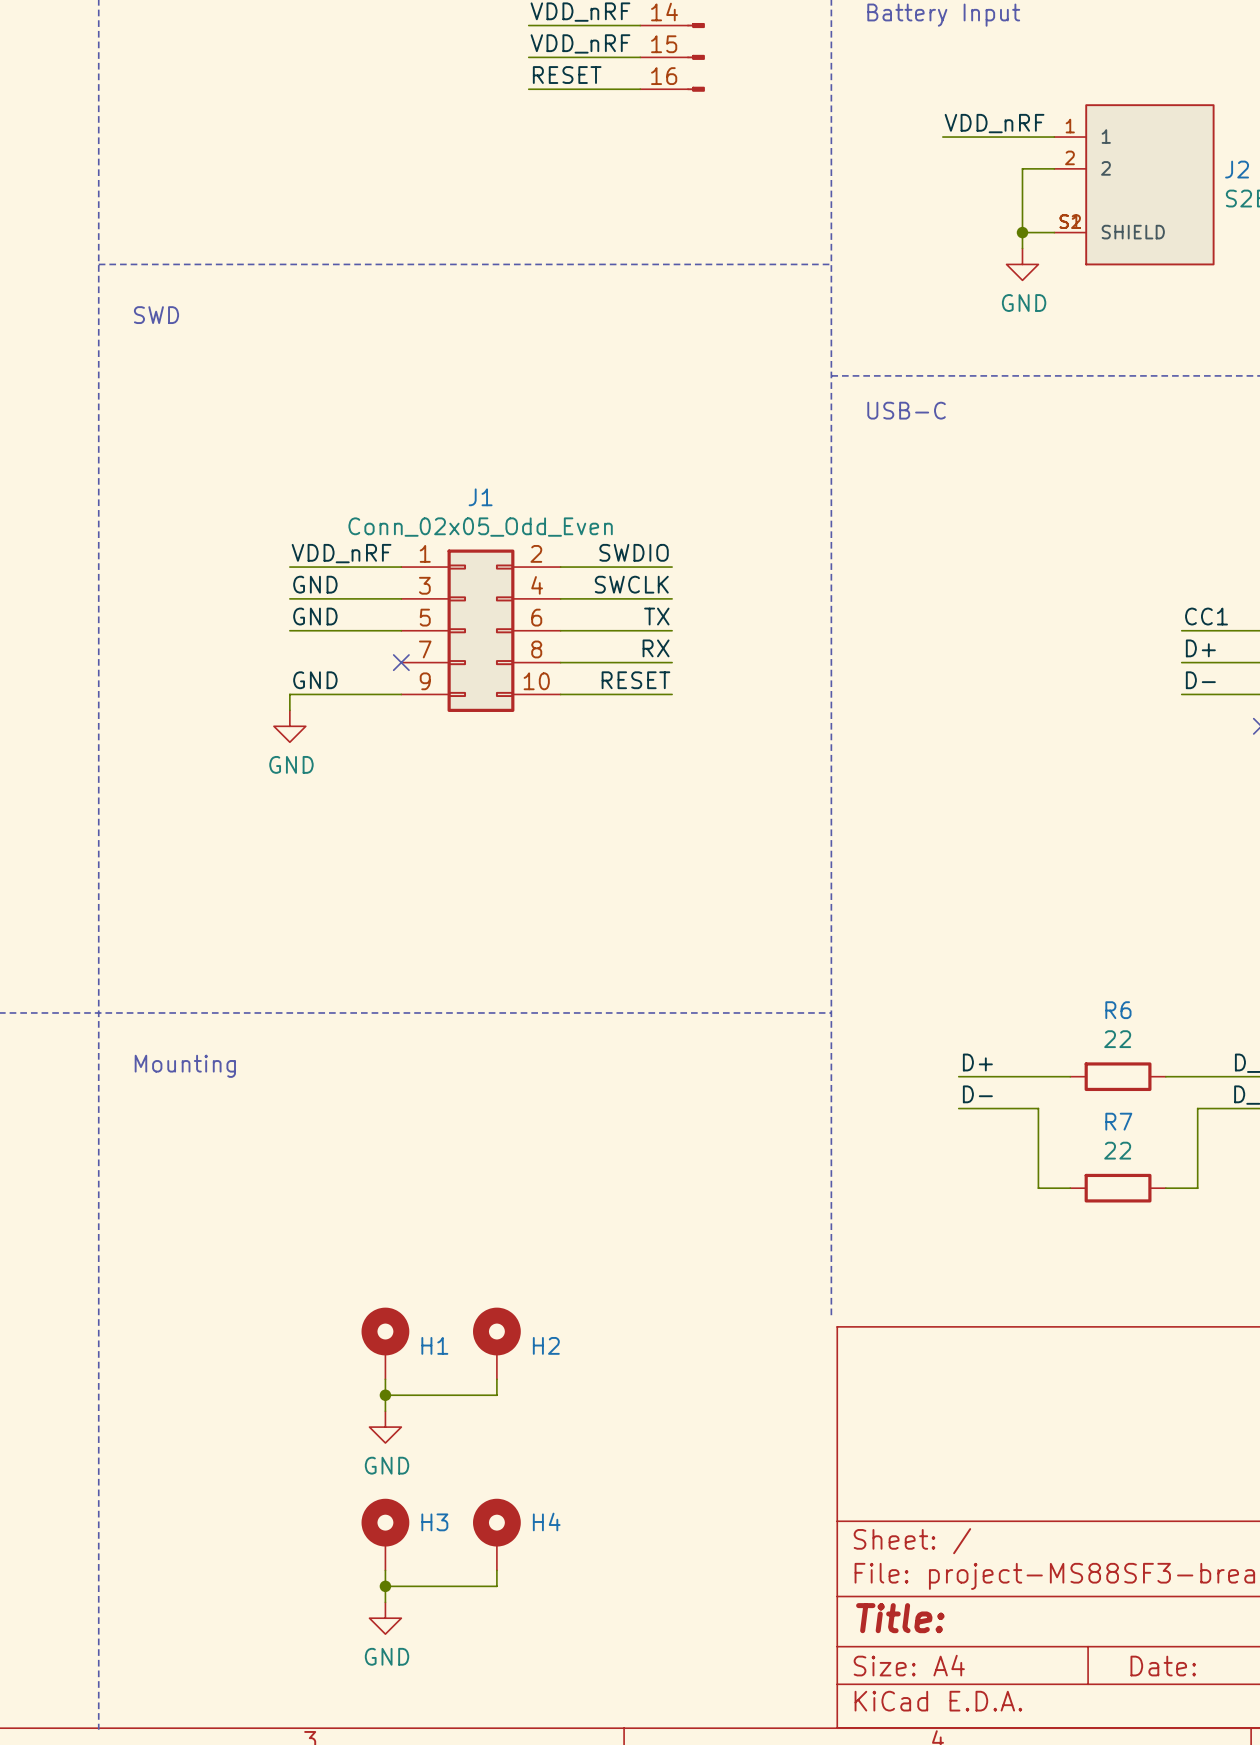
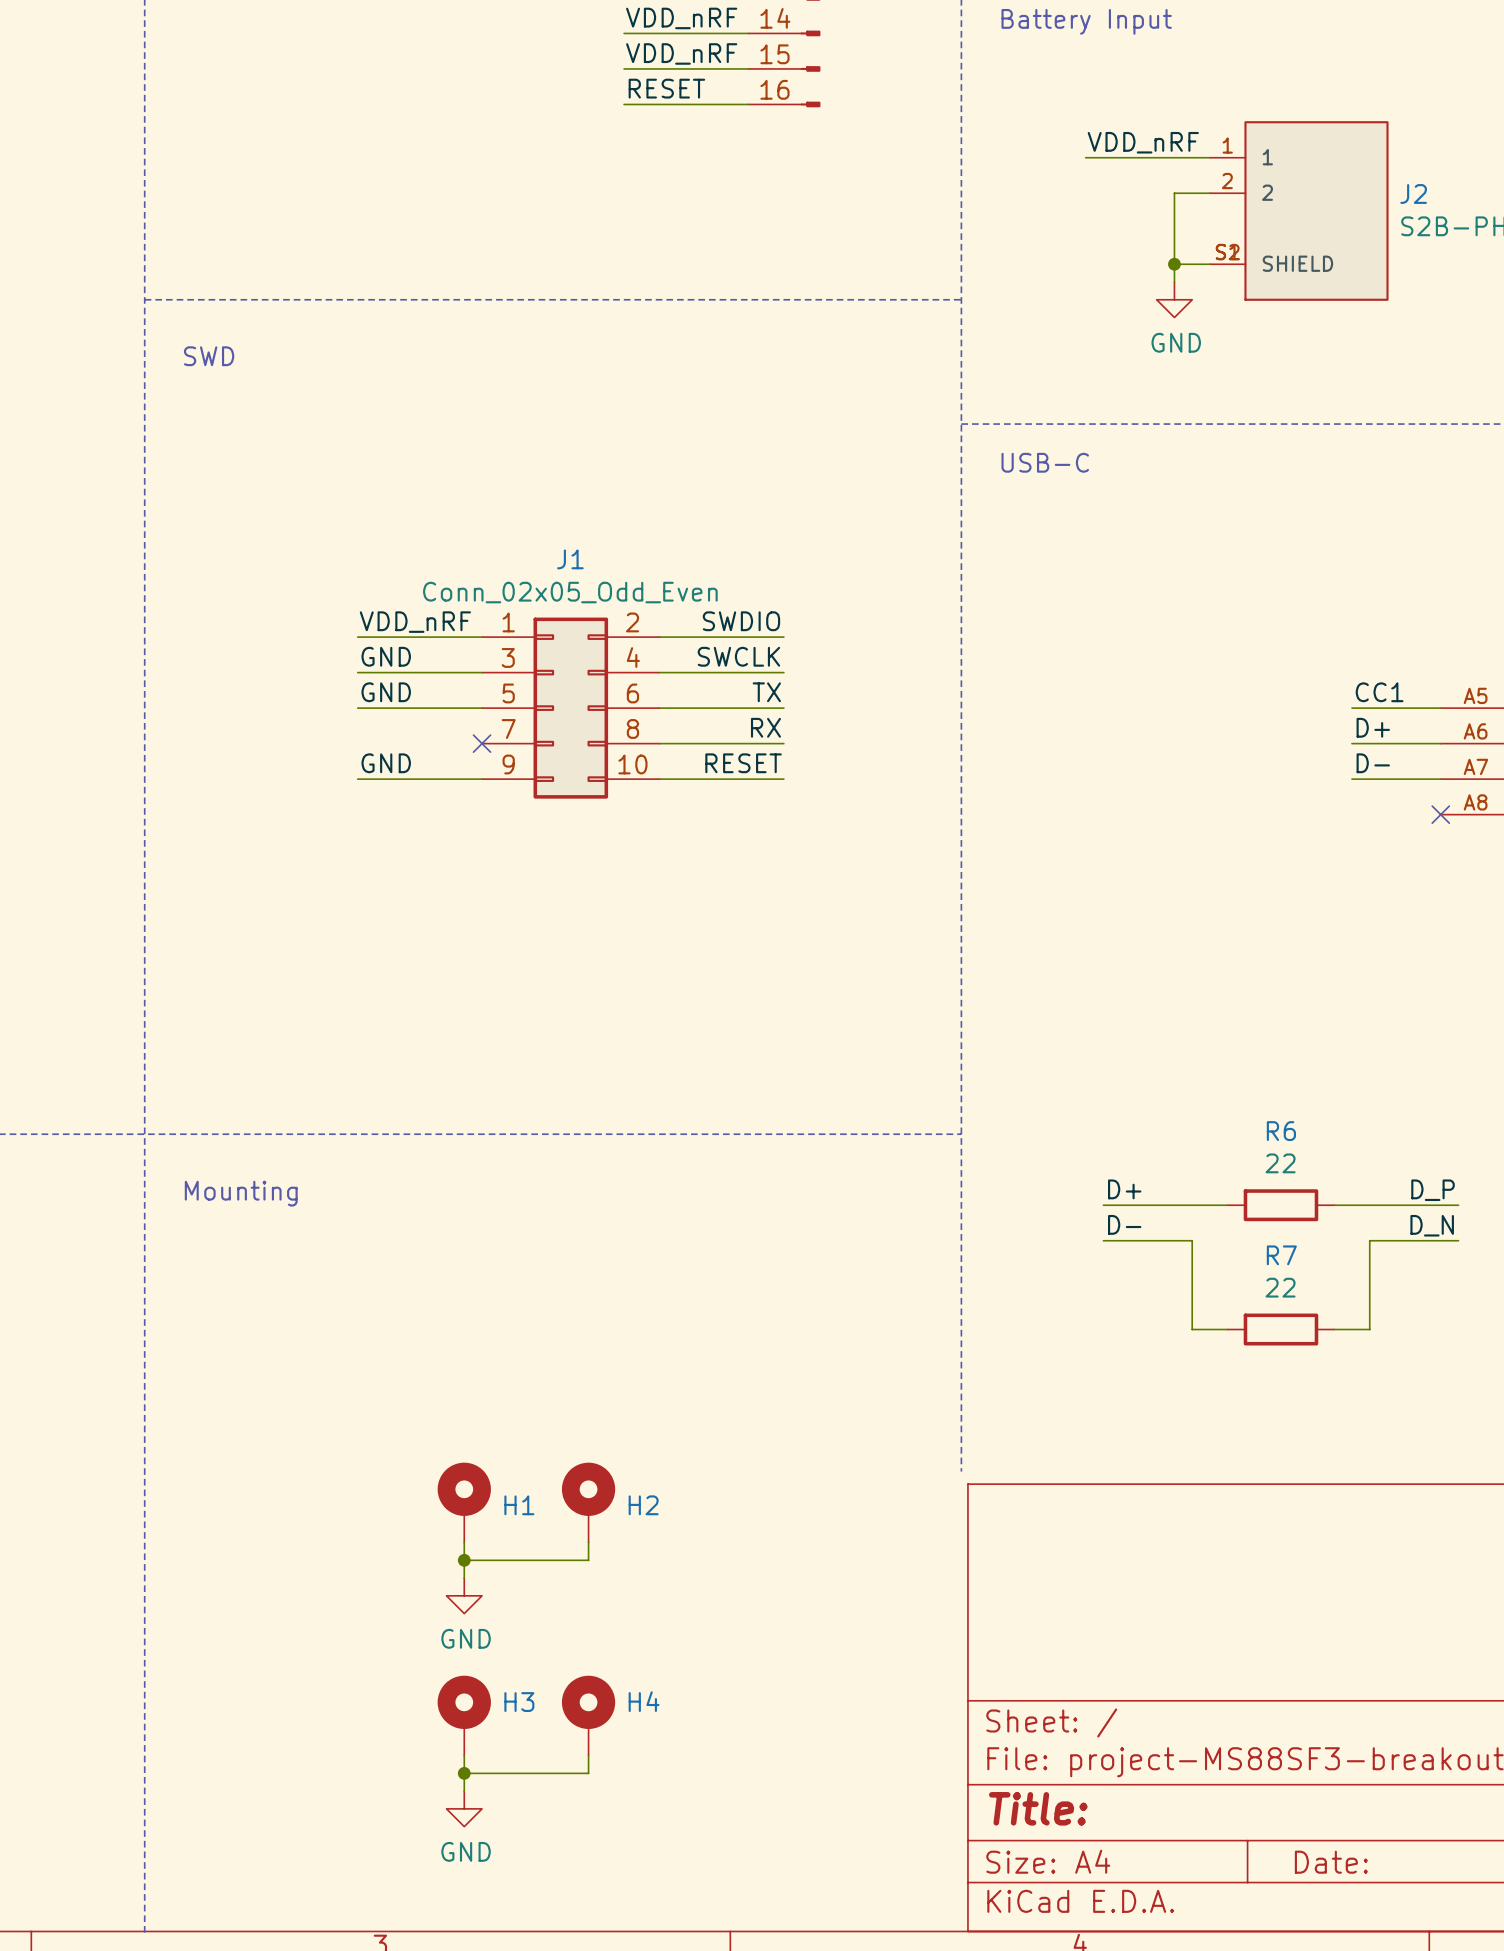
wire: (289, 694) (289, 710) -> none
power symbol: GND (289, 726) -> none

